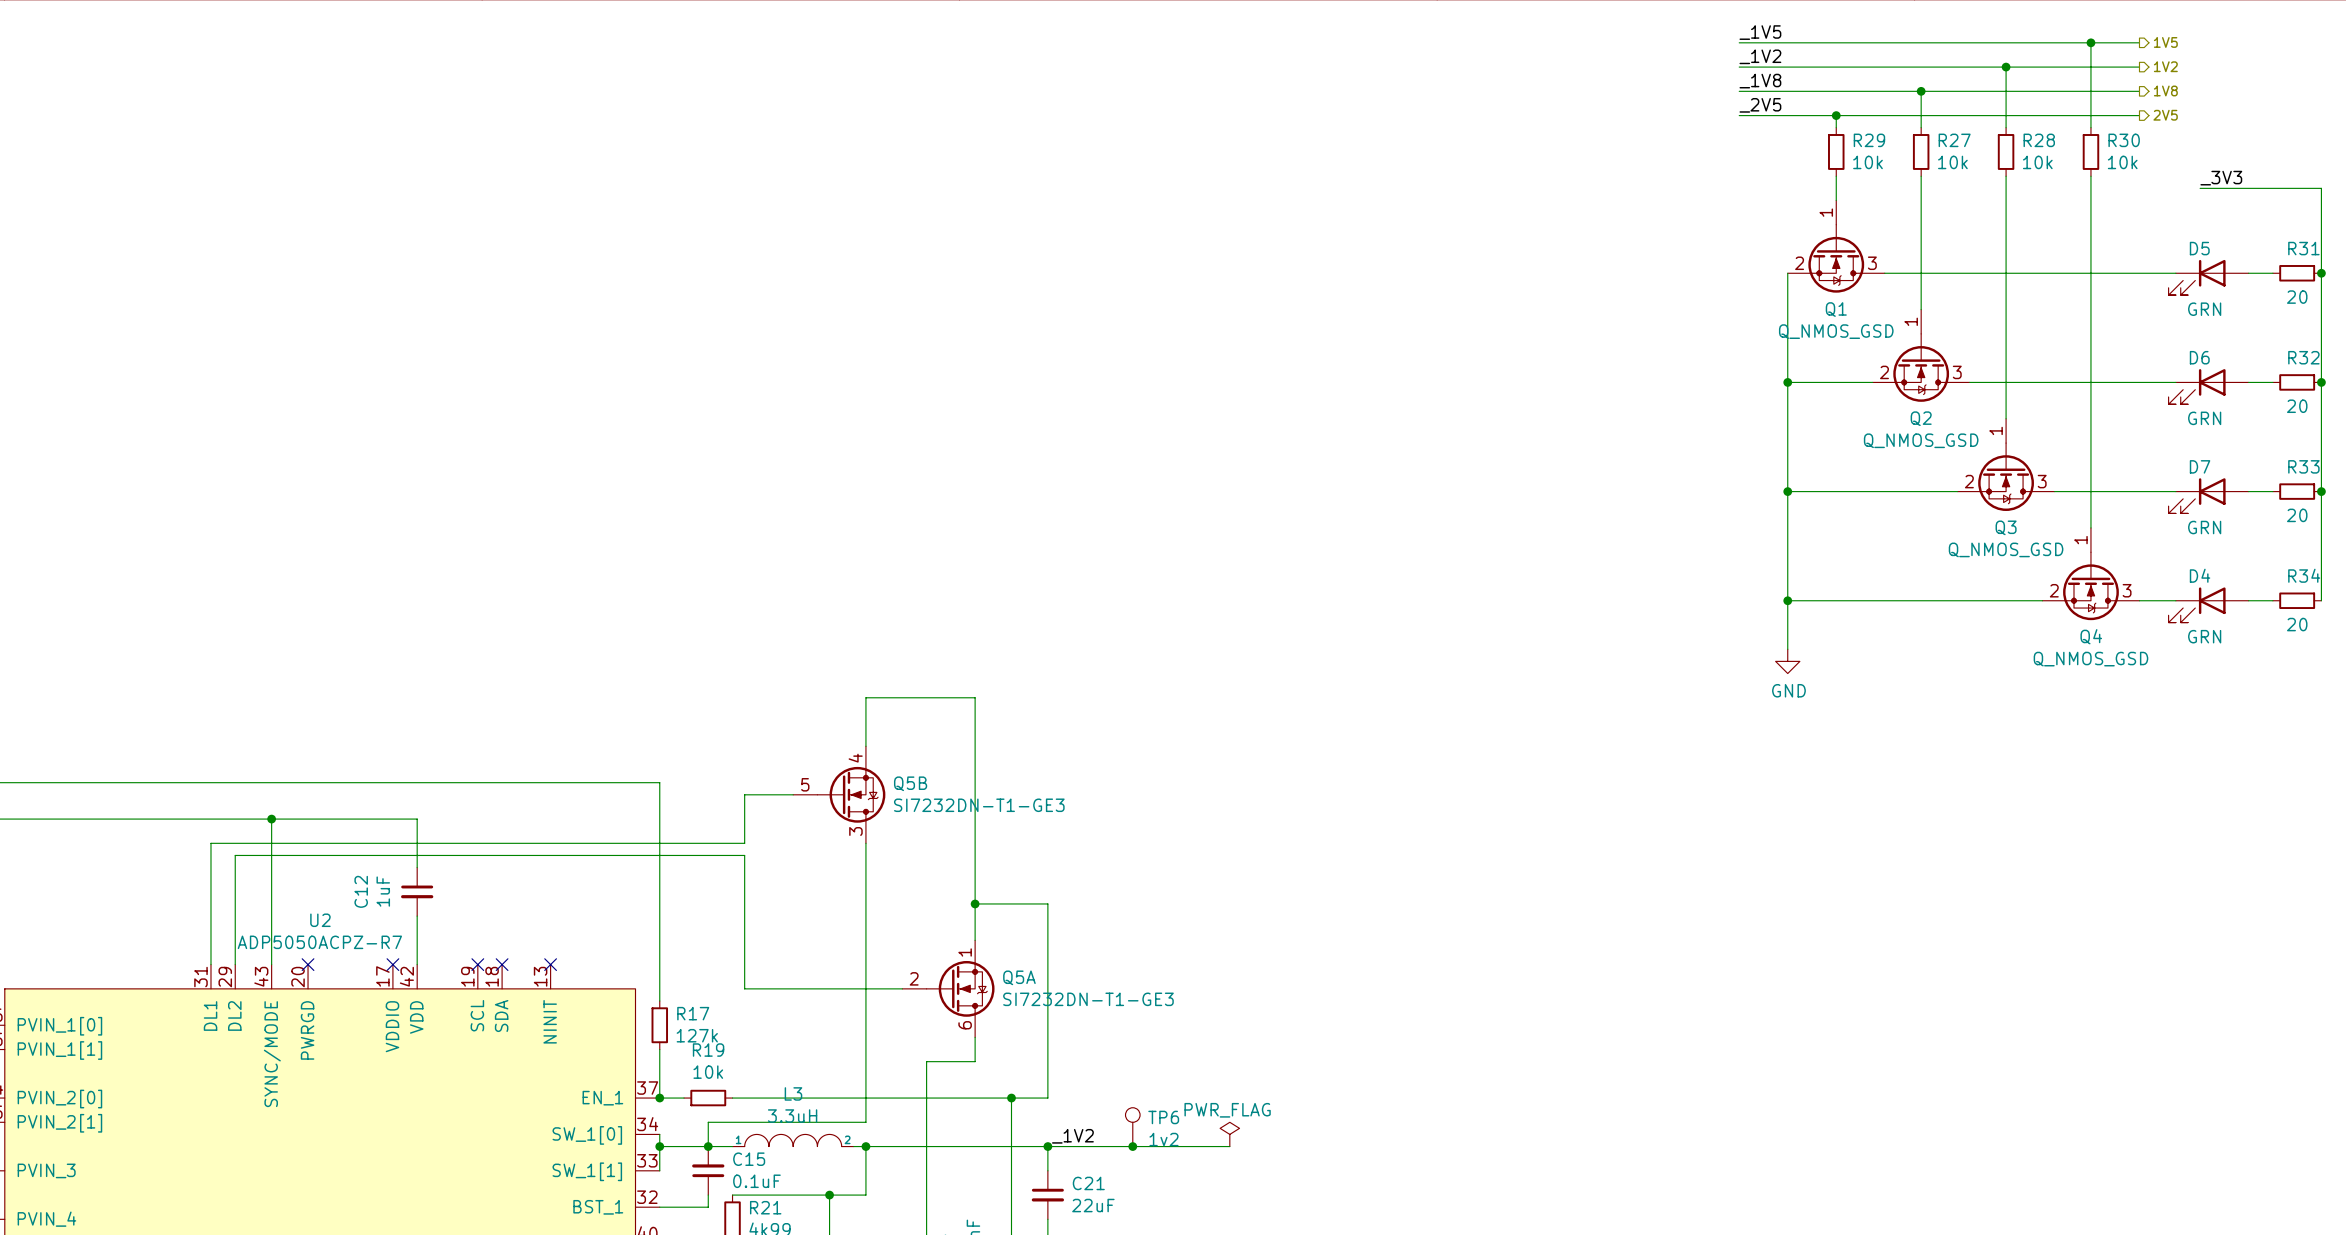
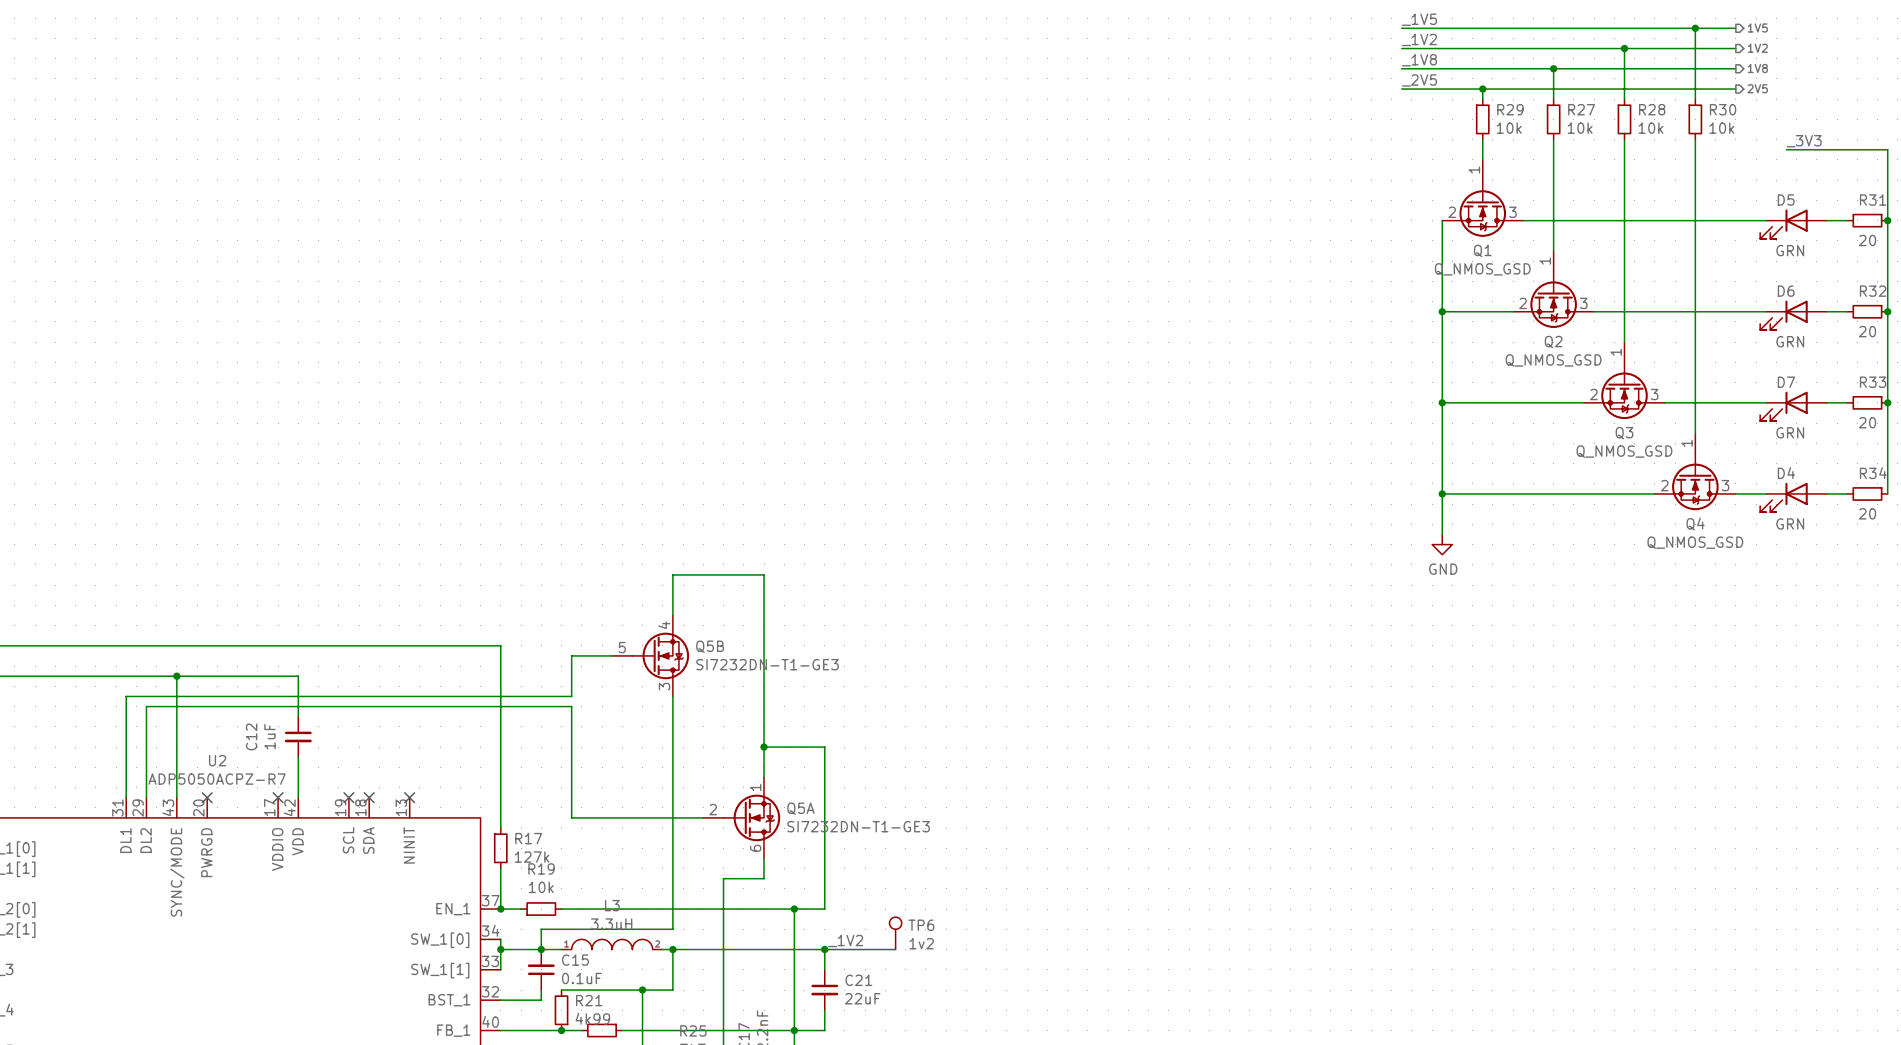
power symbol: PWR_FLAG (1229, 1134) -> none
wire: (1132, 1146) (1229, 1146) -> none
junction: (1132, 1146) -> none

